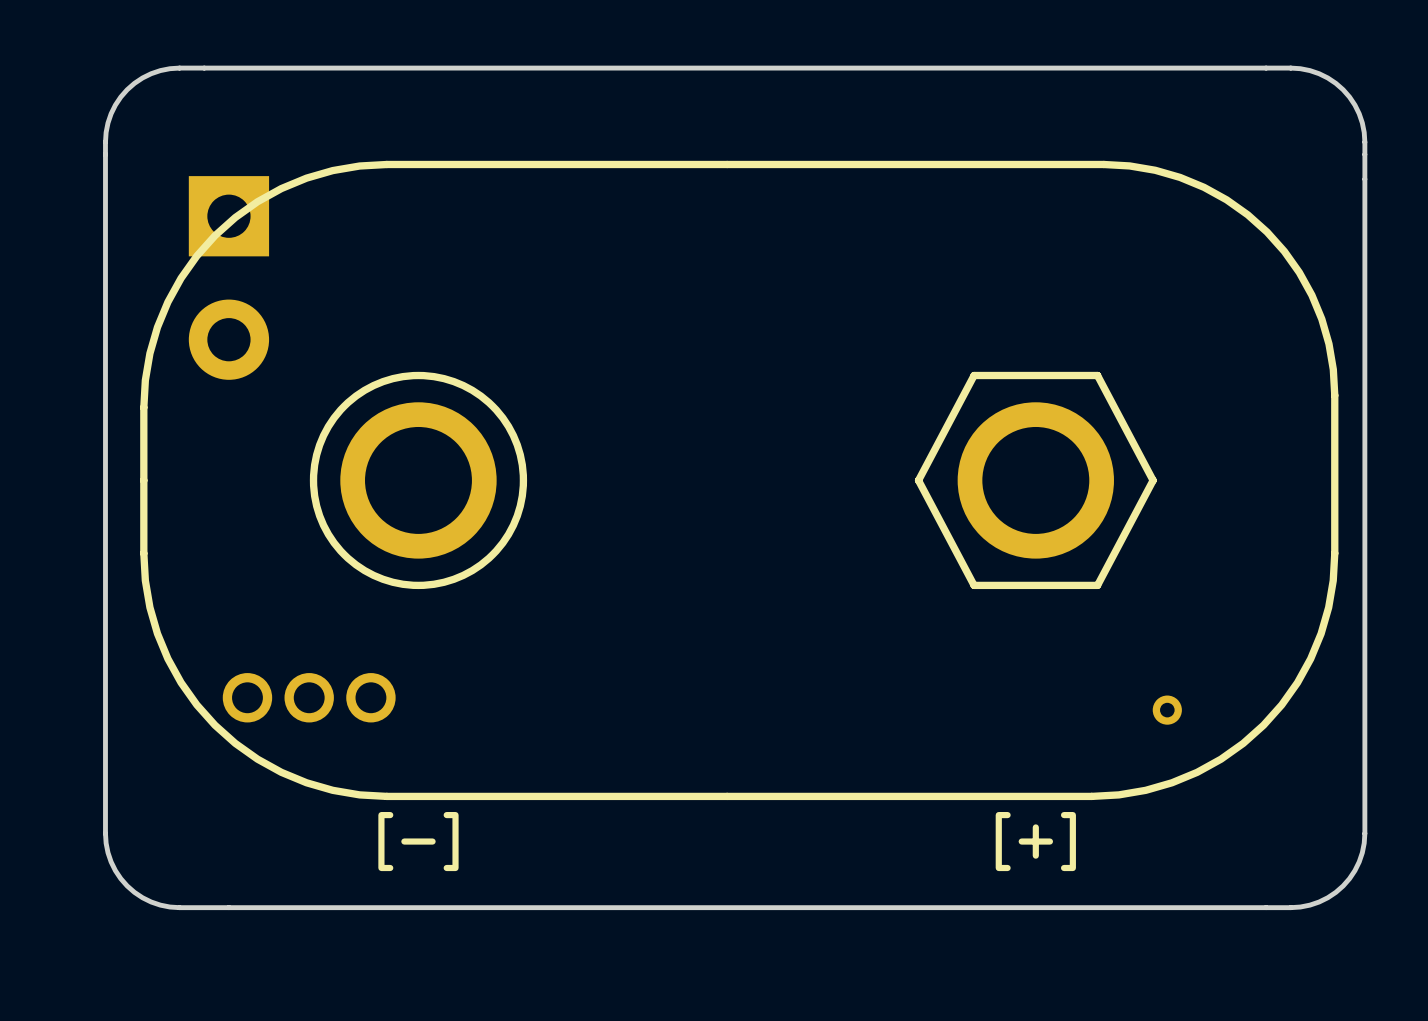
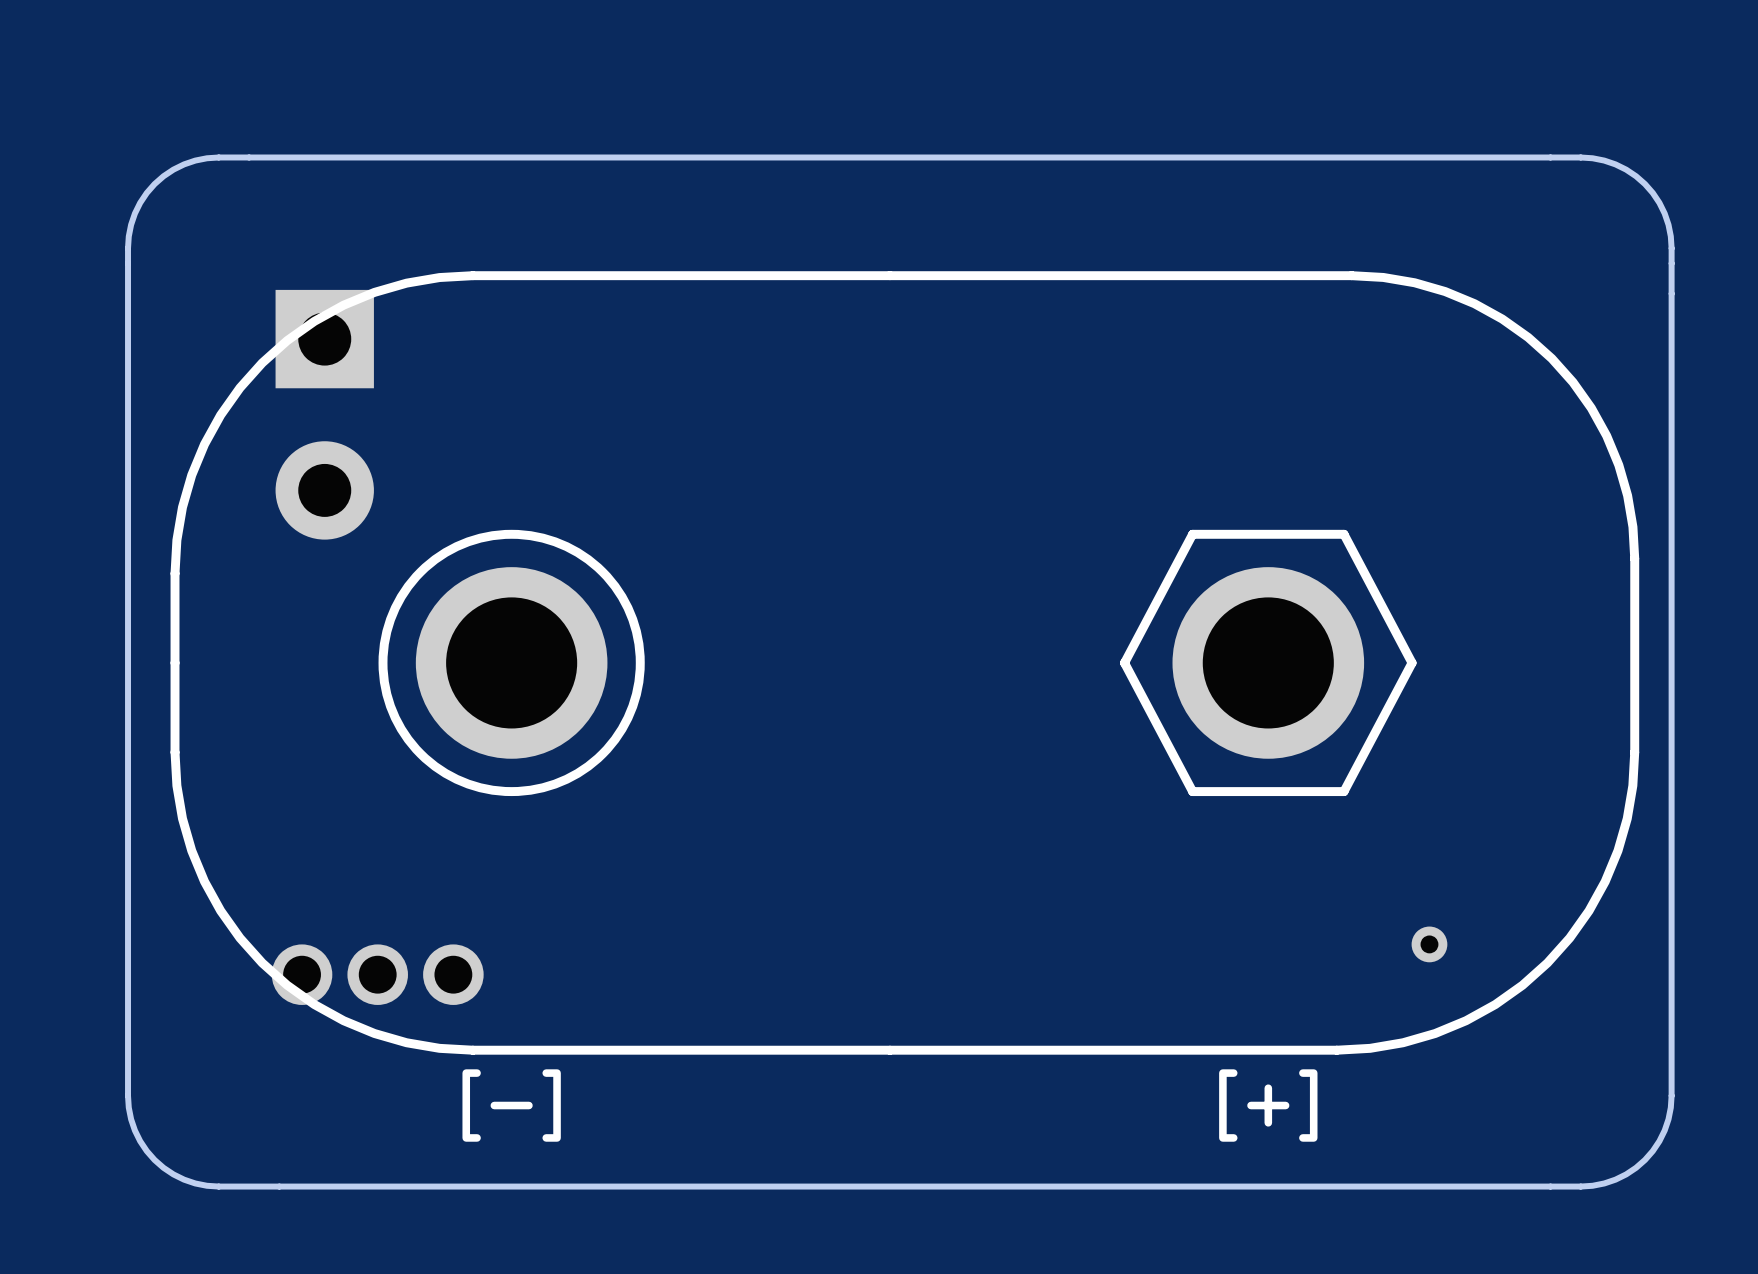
part position: (228, 277) -> (324, 414)
part position: (309, 697) -> (377, 974)

